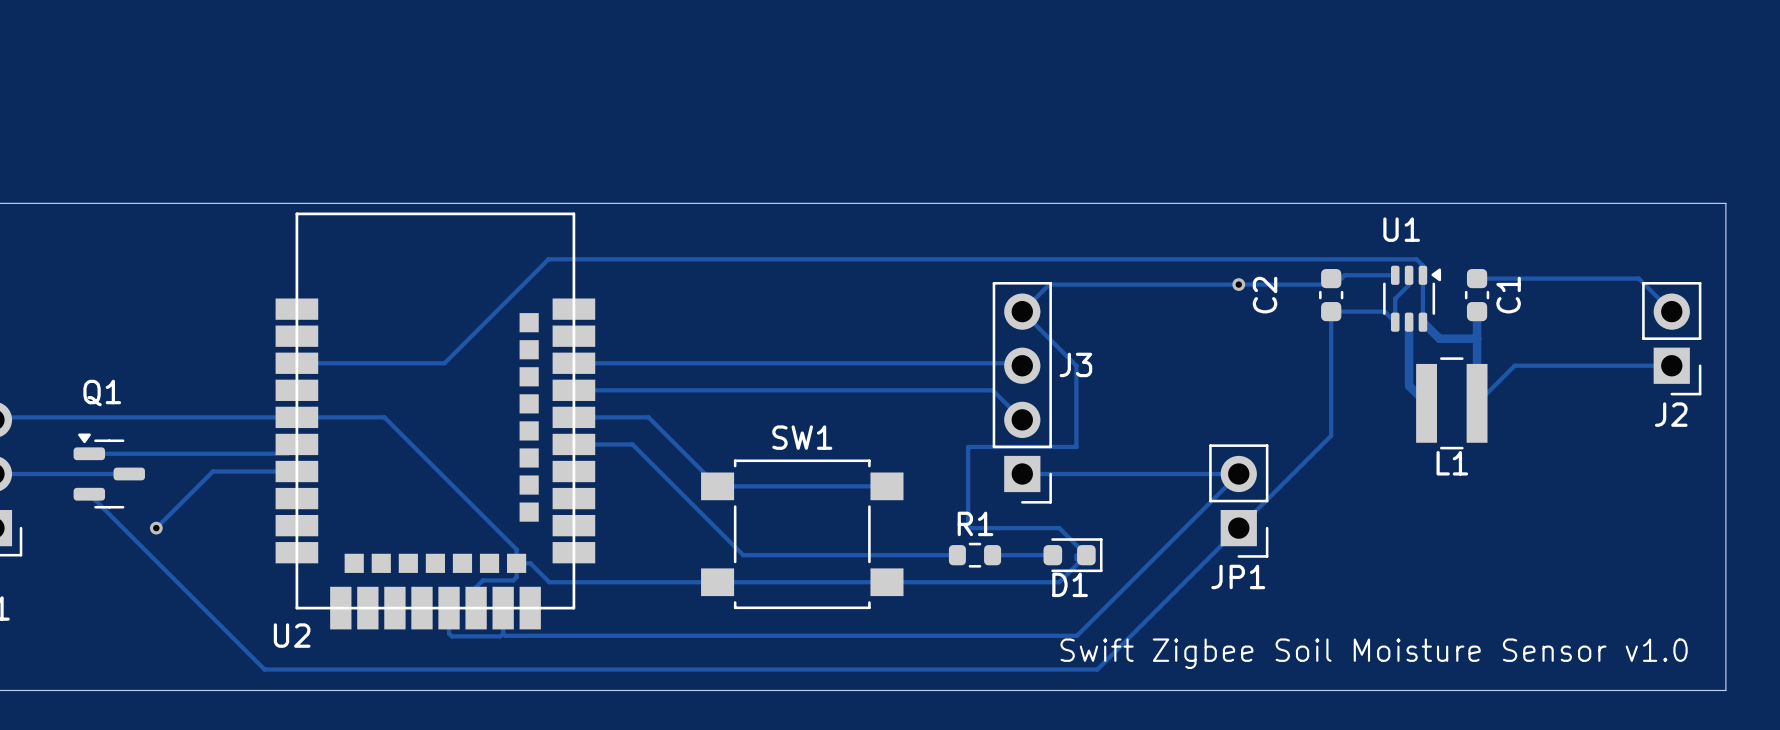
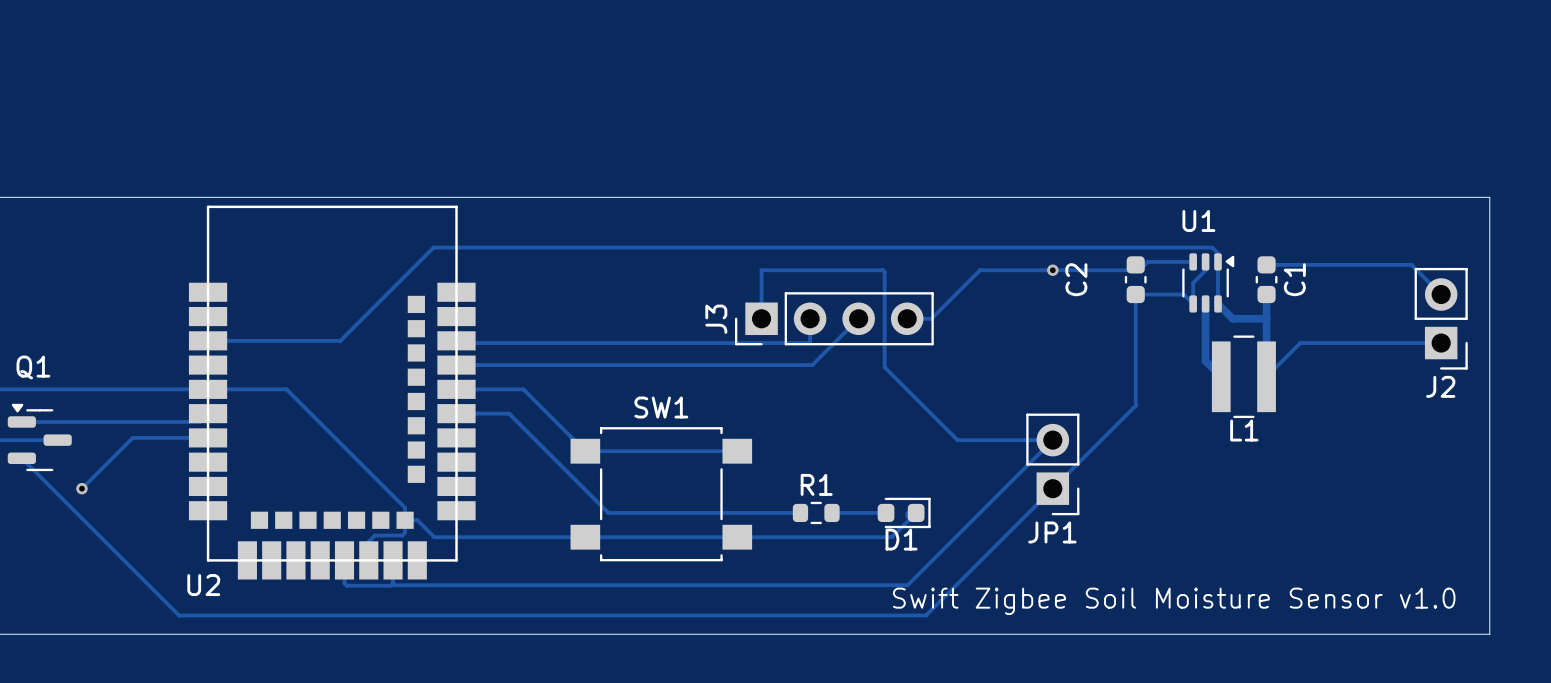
track: (1157, 284) (1049, 284) (1022, 311) (1076, 365) (1076, 446) (968, 446) (968, 528) (1059, 528) (1086, 555) -> (980, 270) (931, 318) (907, 318)
track: none -> (810, 318) (810, 343) (458, 343)
track: (573, 363) (1019, 363) (1022, 365) -> none
J3 name position: J3 (1075, 364) -> J3 (716, 319)
track: (970, 390) (992, 390) (1022, 419) -> (812, 365) (858, 318)
J3 rotation: 0° (1022, 392) -> 90° clockwise (834, 318)
track: (1022, 473) (1132, 473) -> (761, 318) (761, 270) (882, 270) (884, 271) (884, 367) (957, 440)

